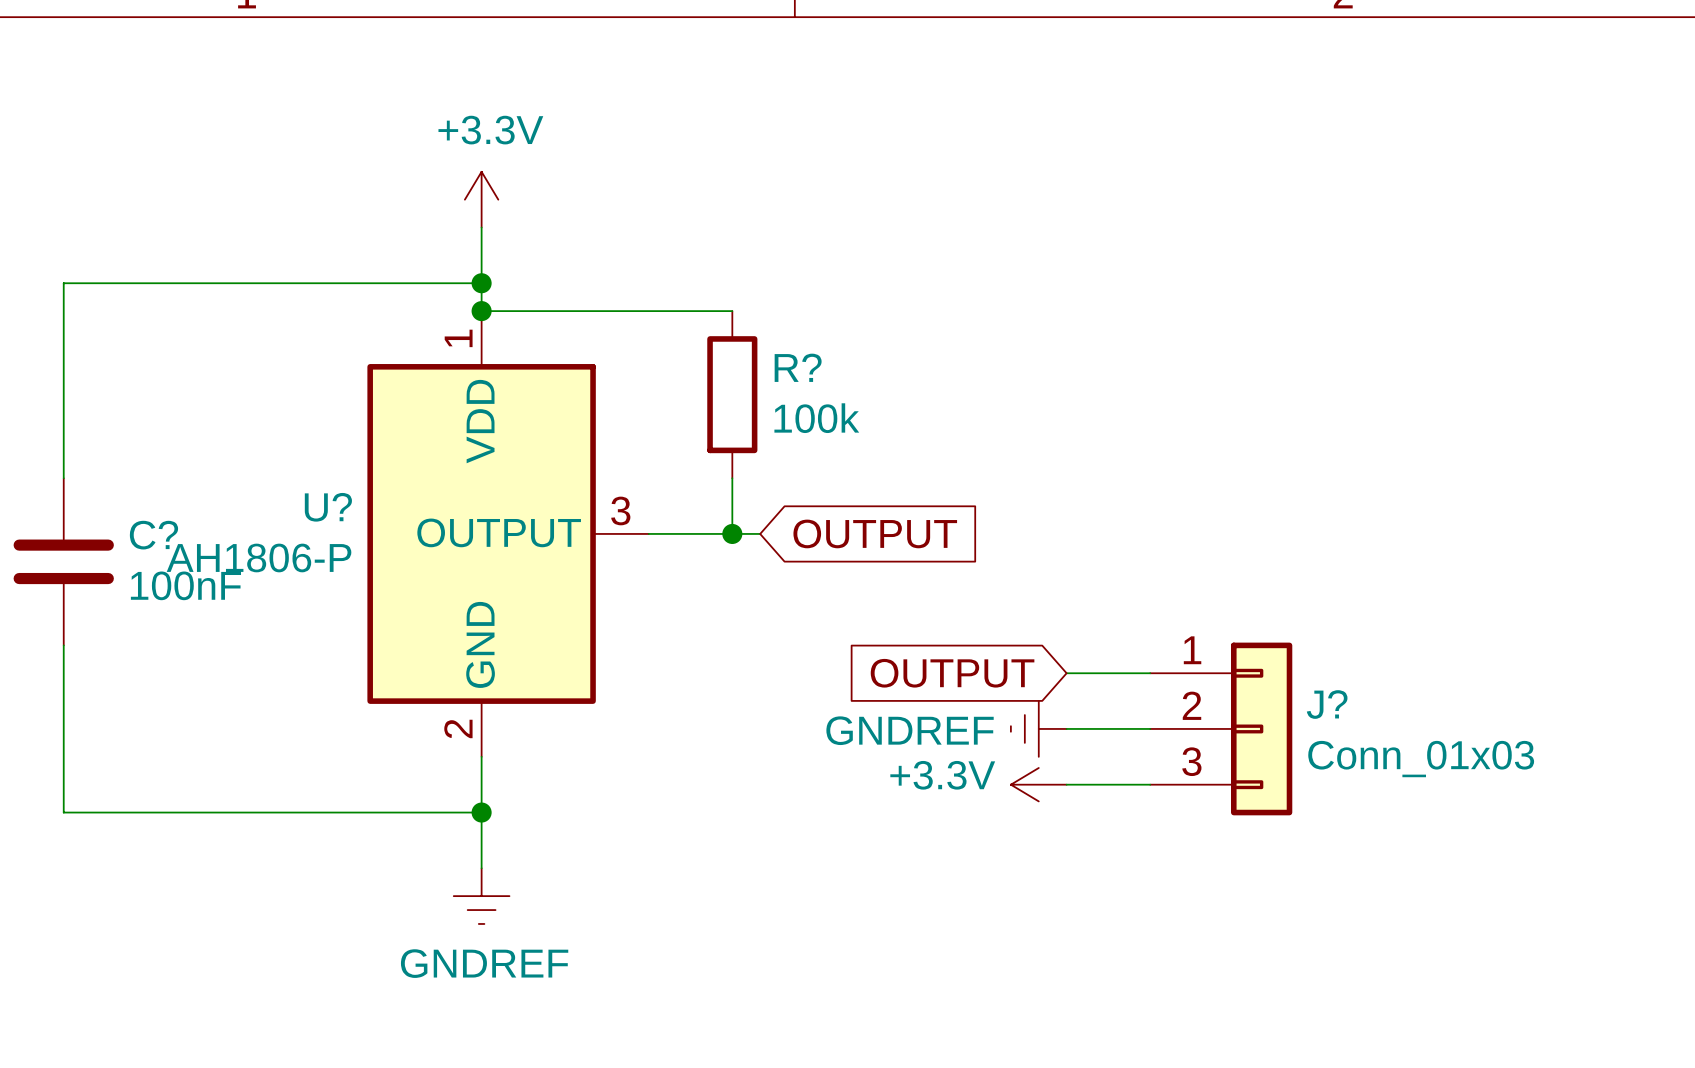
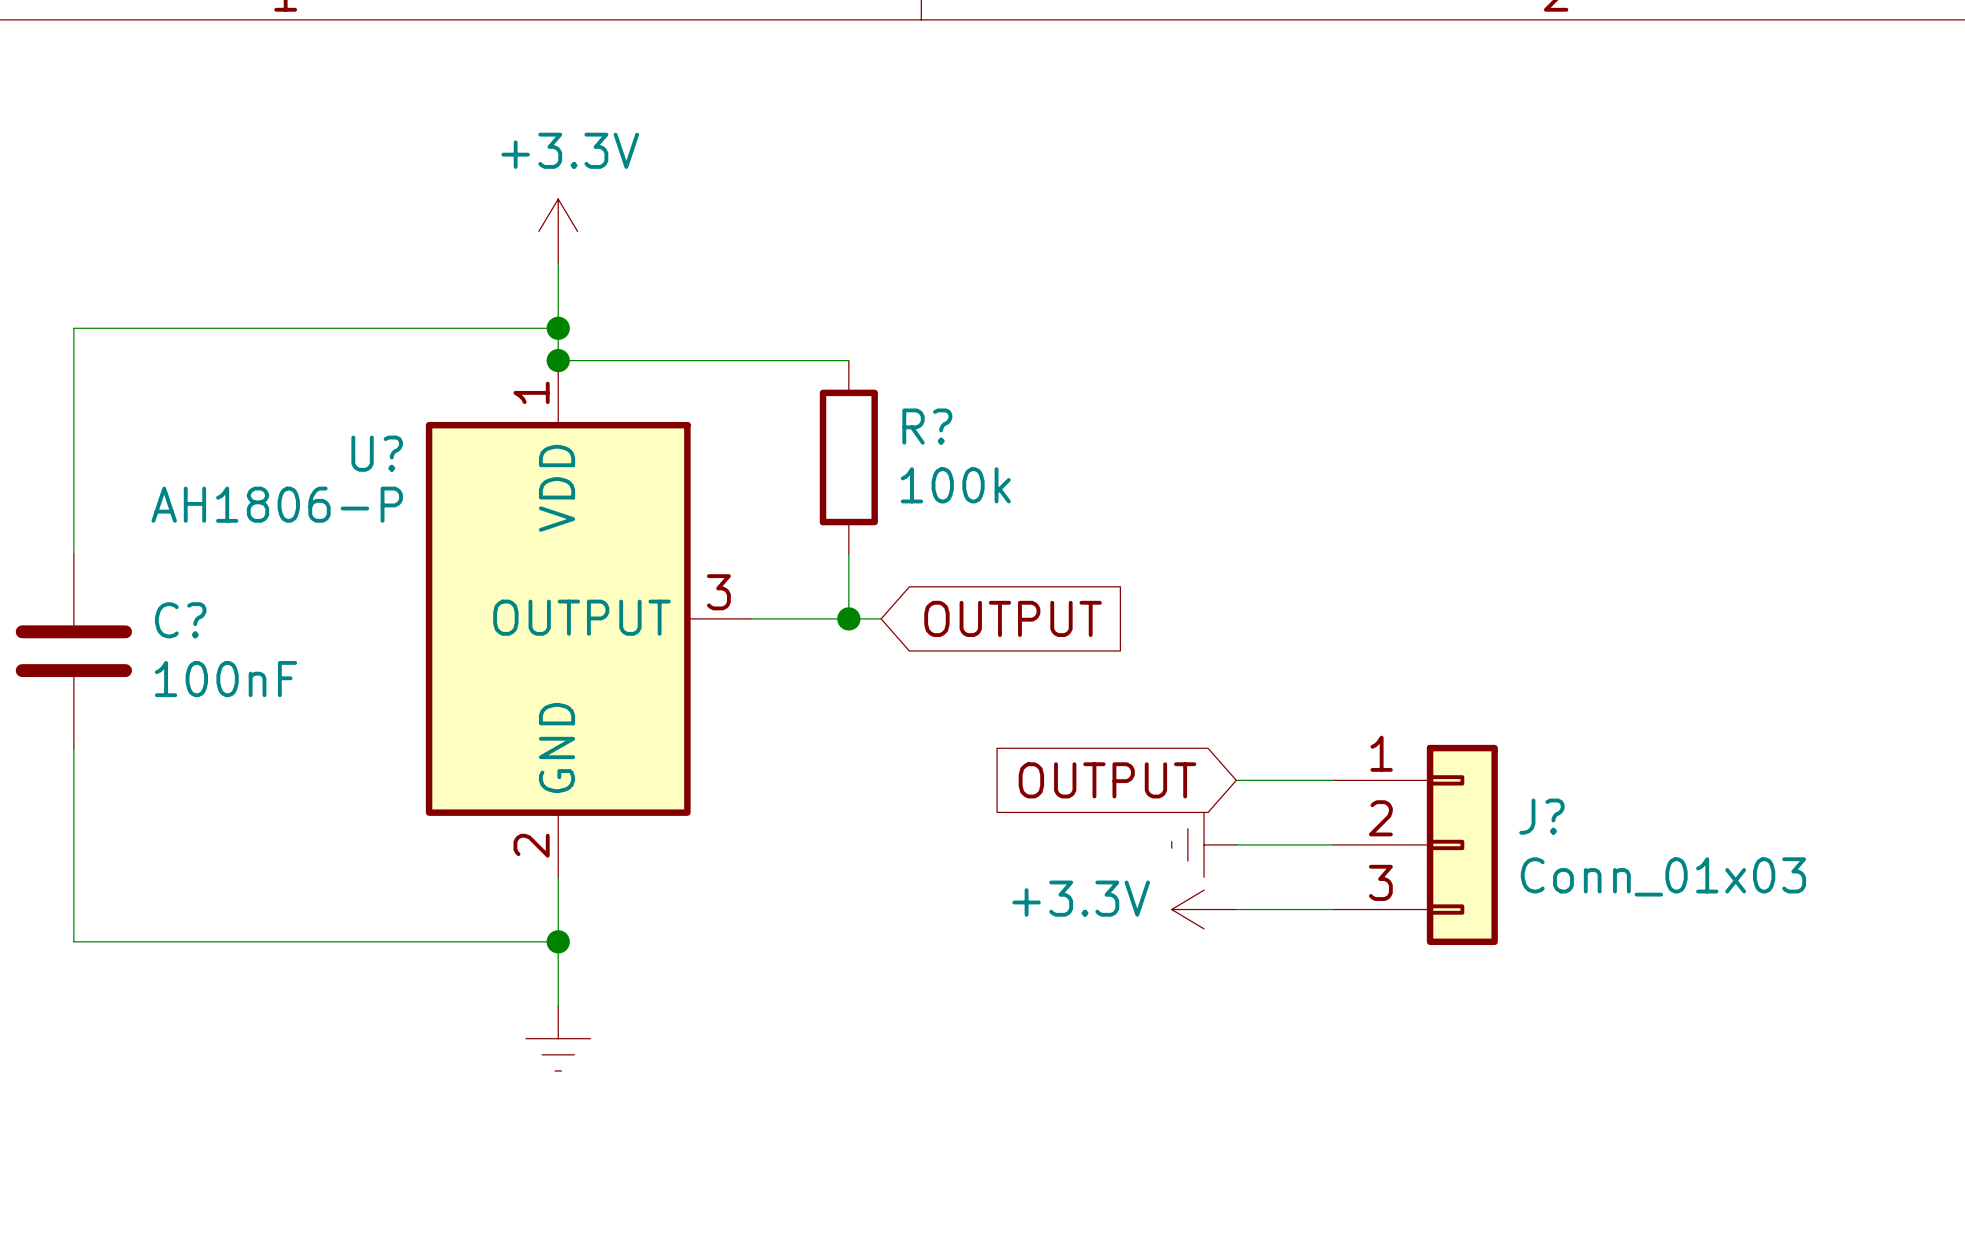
U? name position: U? (328, 507) -> U? (377, 453)
U? value position: AH1806-P (259, 557) -> AH1806-P (277, 504)
power symbol text: GNDREF (910, 730) -> none
power symbol text: GNDREF (484, 963) -> none

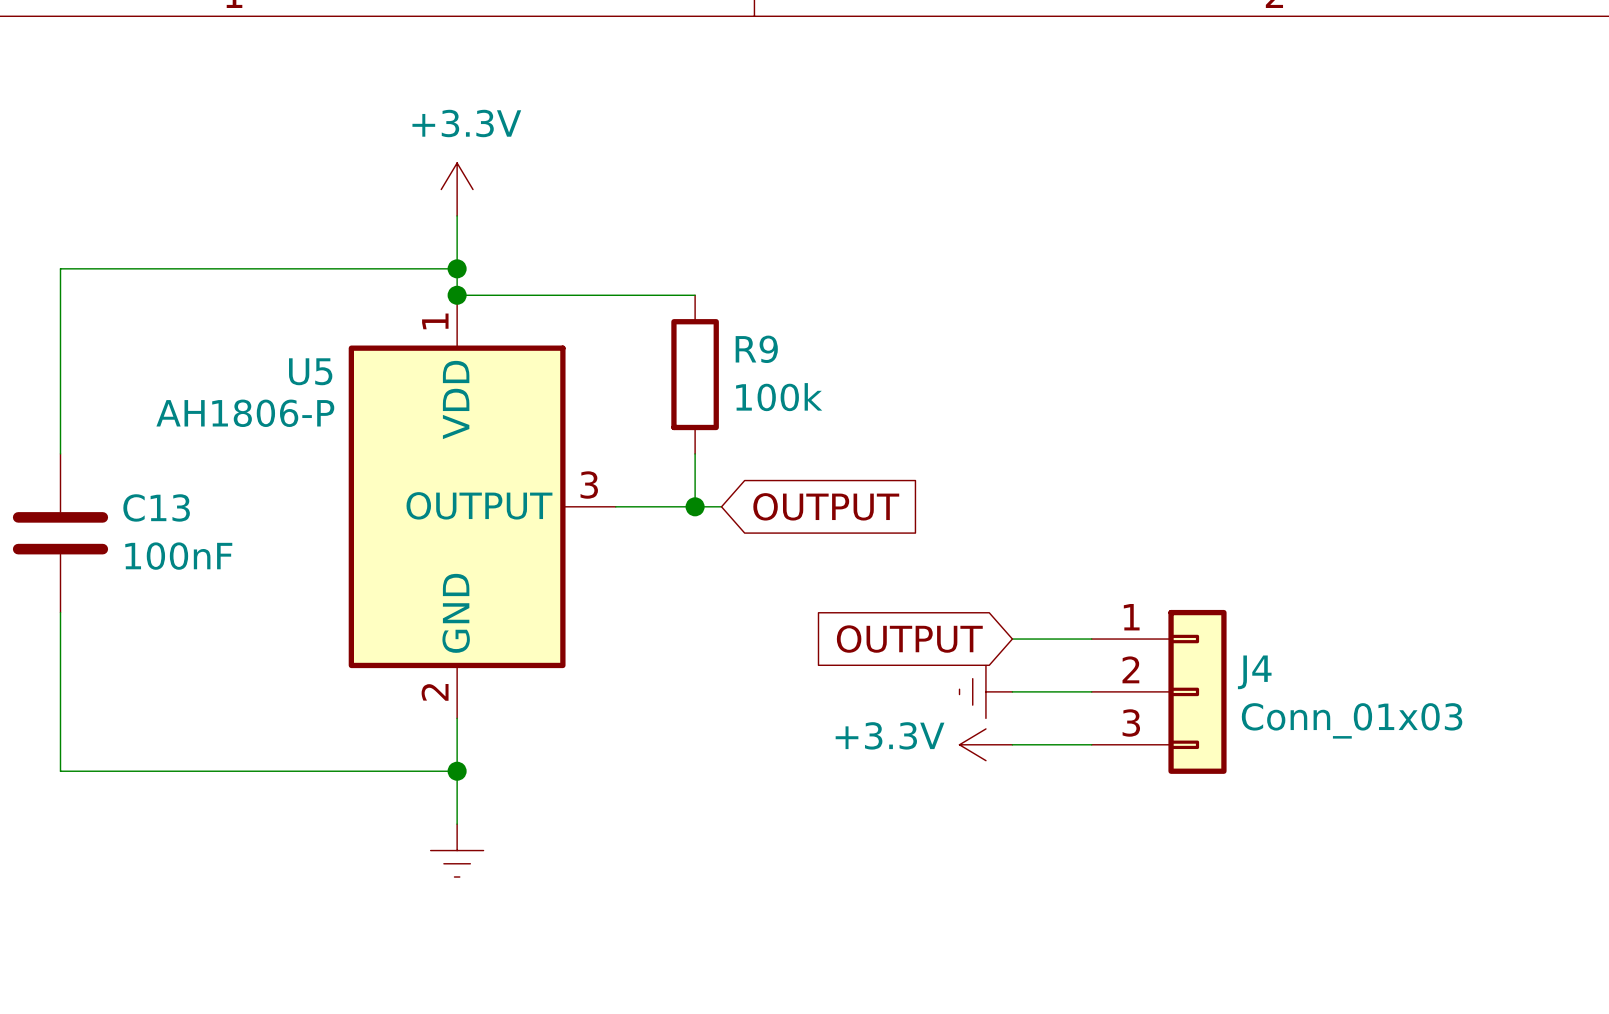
R? name: R? (927, 426) -> R9 (756, 349)
U? name: U? (377, 453) -> U5 (310, 371)
C? name: C? (180, 620) -> C13 (156, 507)
J? name: J? (1541, 816) -> J4 (1254, 672)

